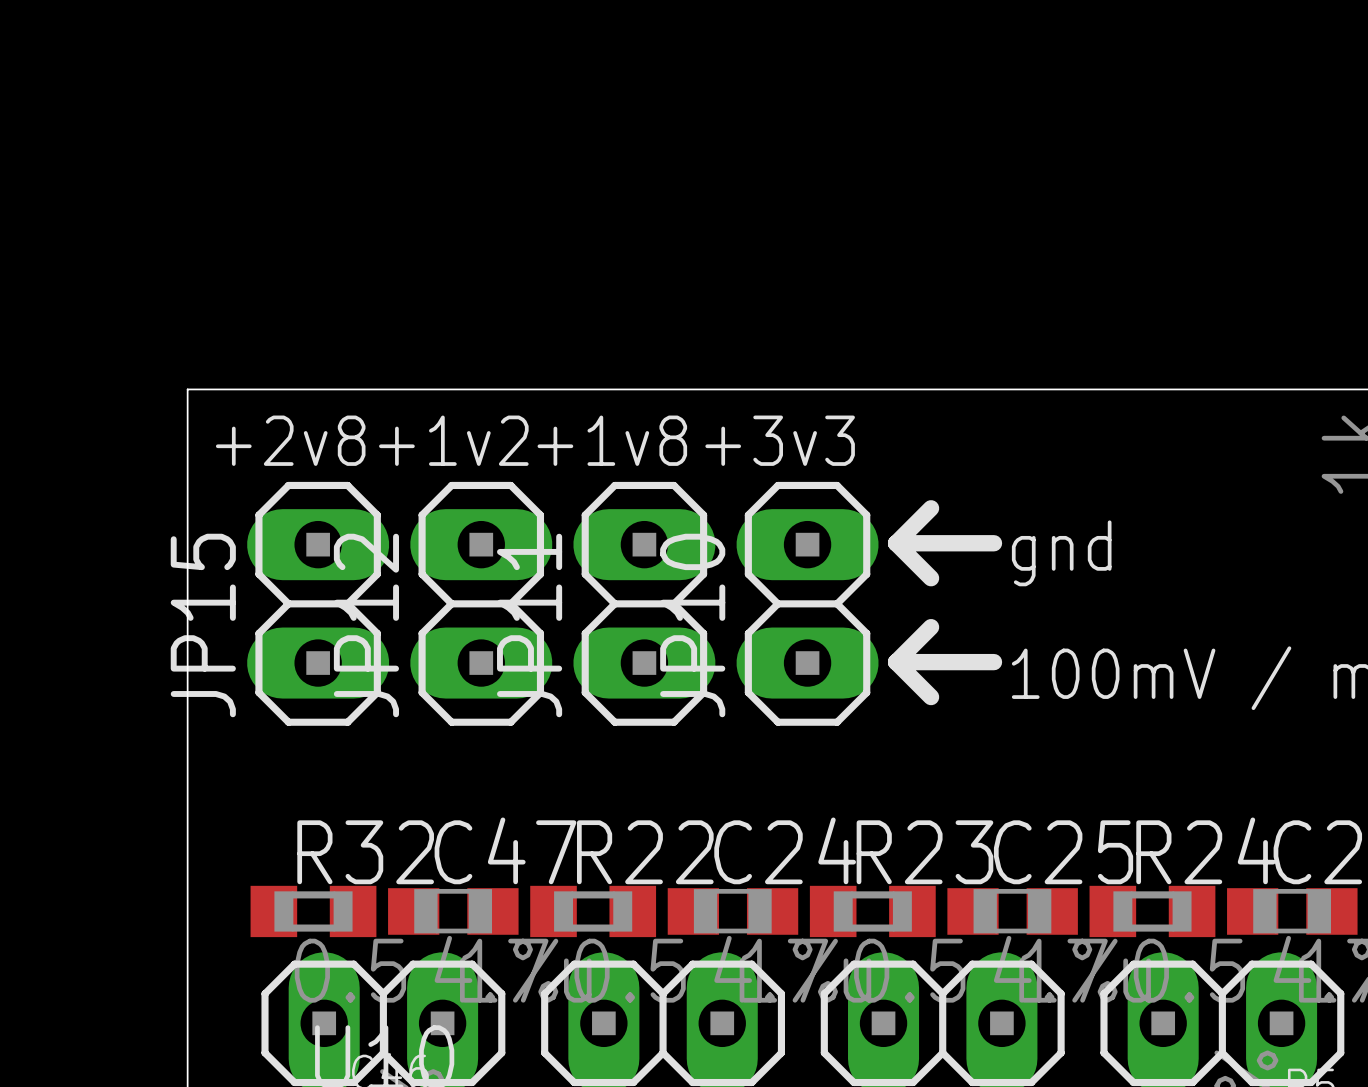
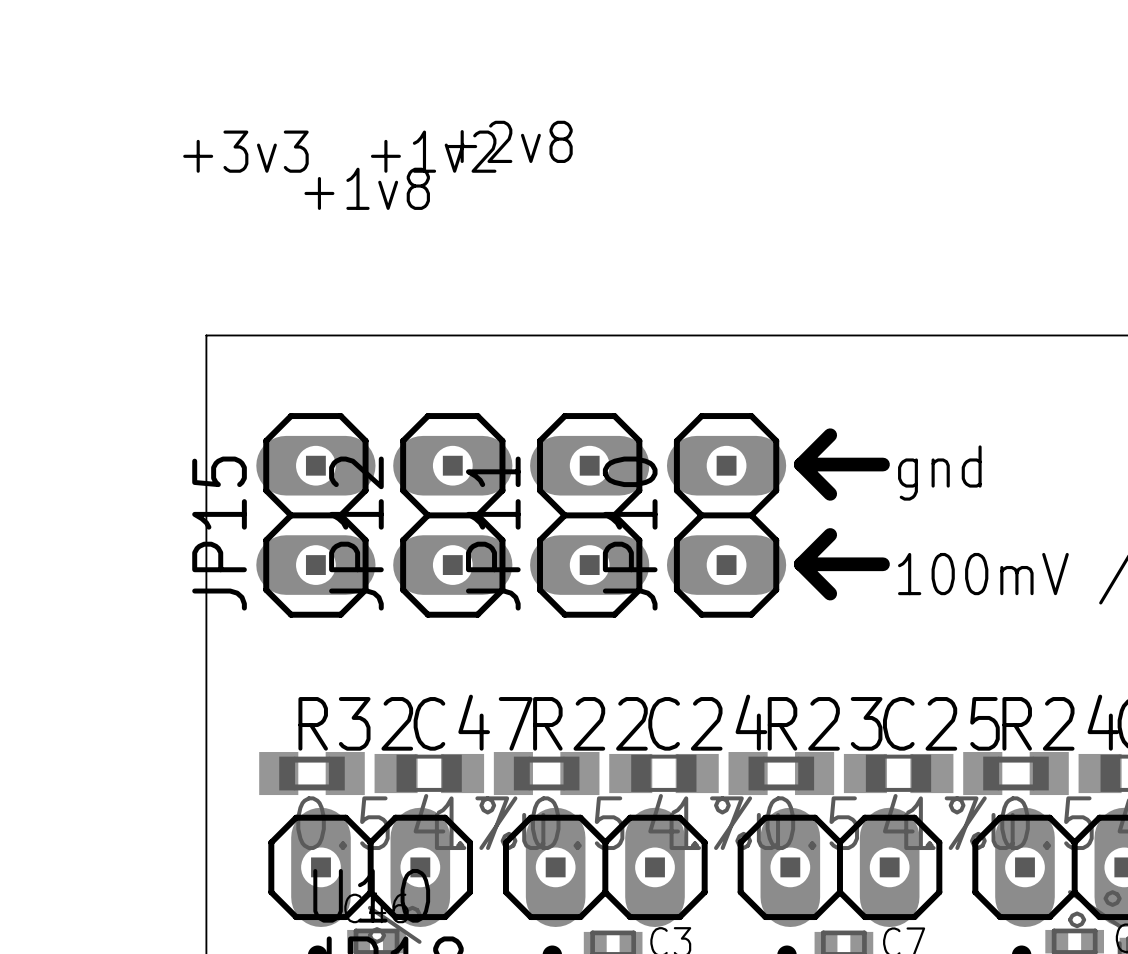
text position: +2v8 (290, 440) -> +2v8 (509, 141)
text position: +1v2 (453, 440) -> +1v2 (433, 151)
text position: +1v8 (612, 440) -> +1v8 (367, 188)
text position: +3v3 (780, 440) -> +3v3 (245, 151)

